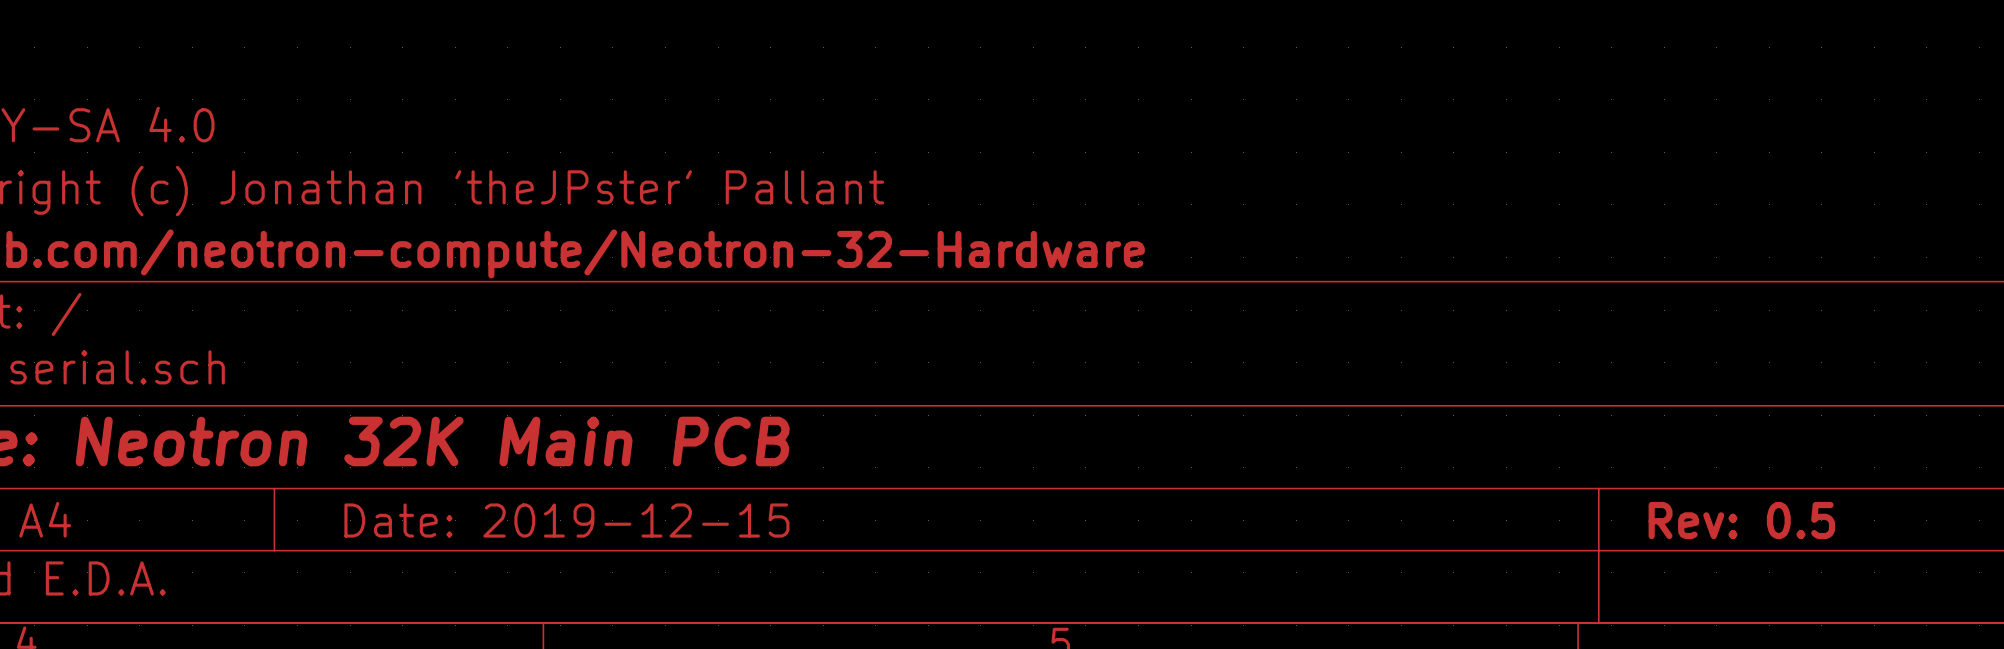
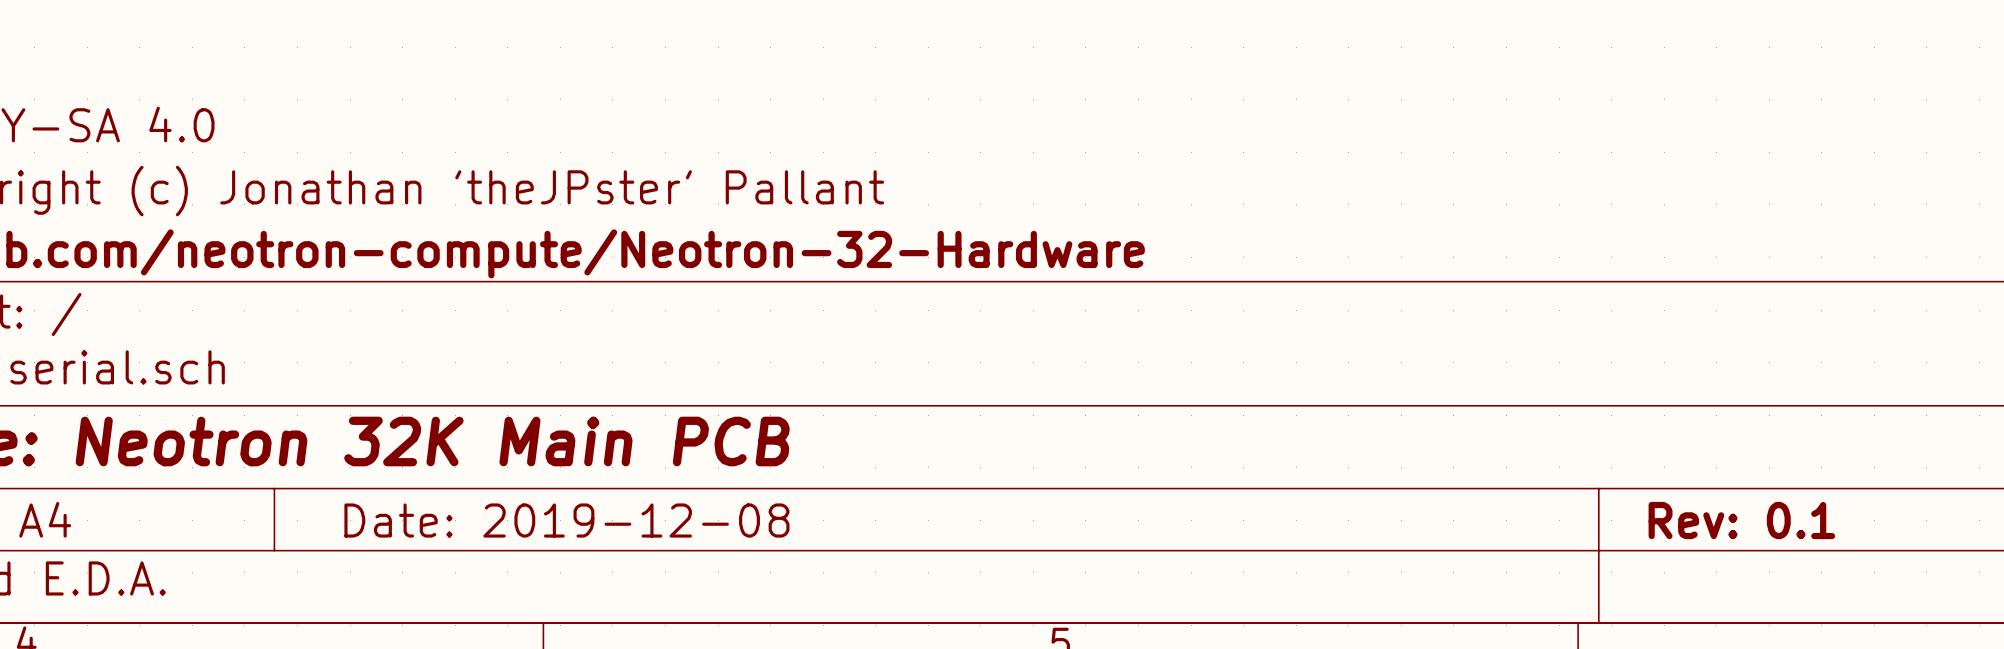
title block: Date: 2019-12-15 (566, 520) -> Date: 2019-12-08 (566, 520)
title block: Rev: 0.5 (1741, 520) -> Rev: 0.1 (1741, 520)

